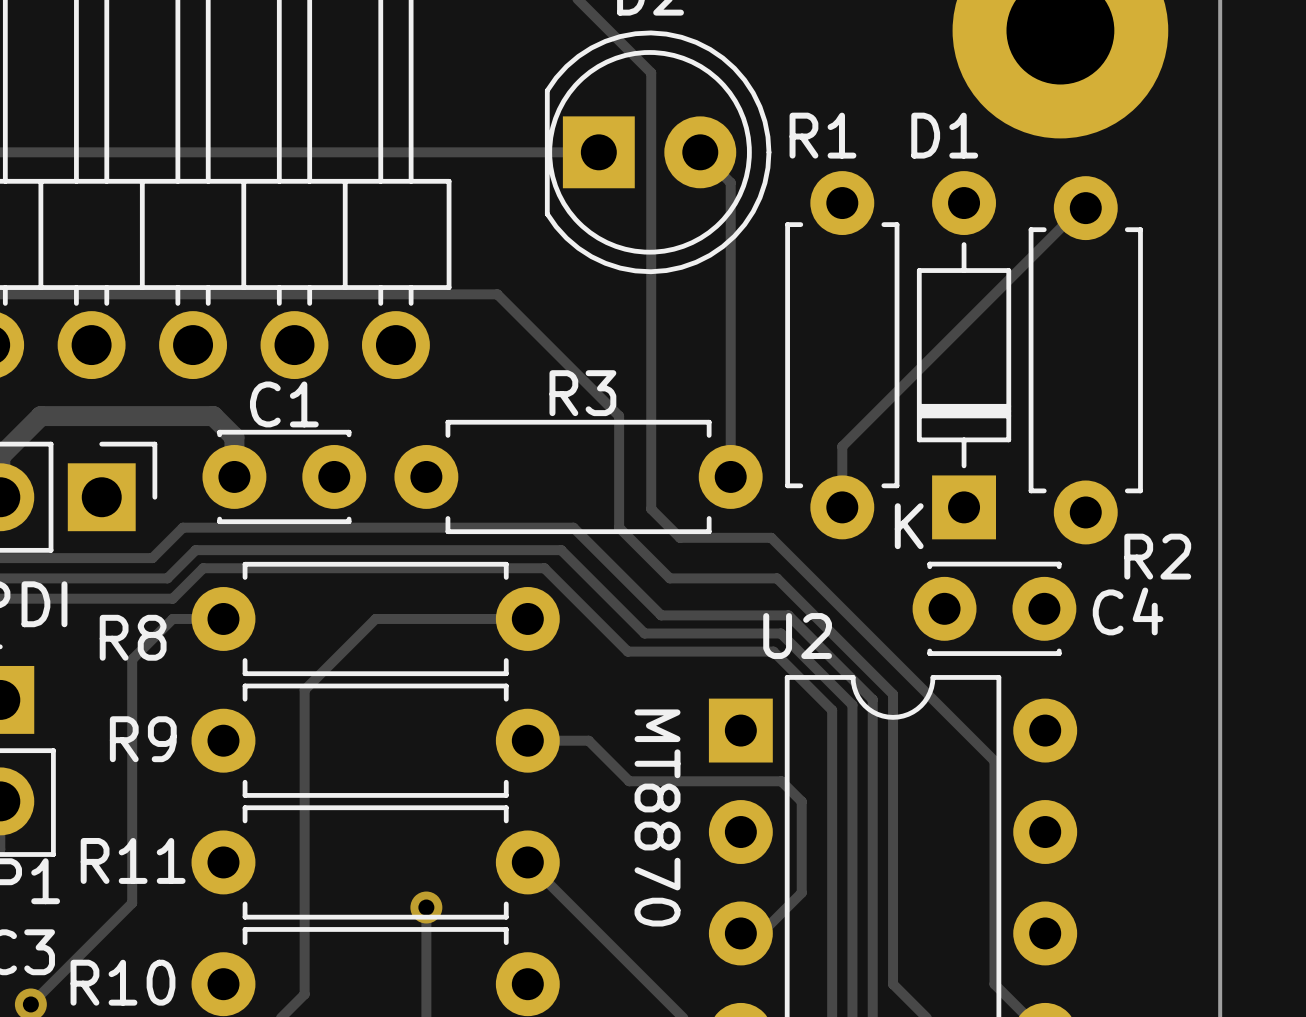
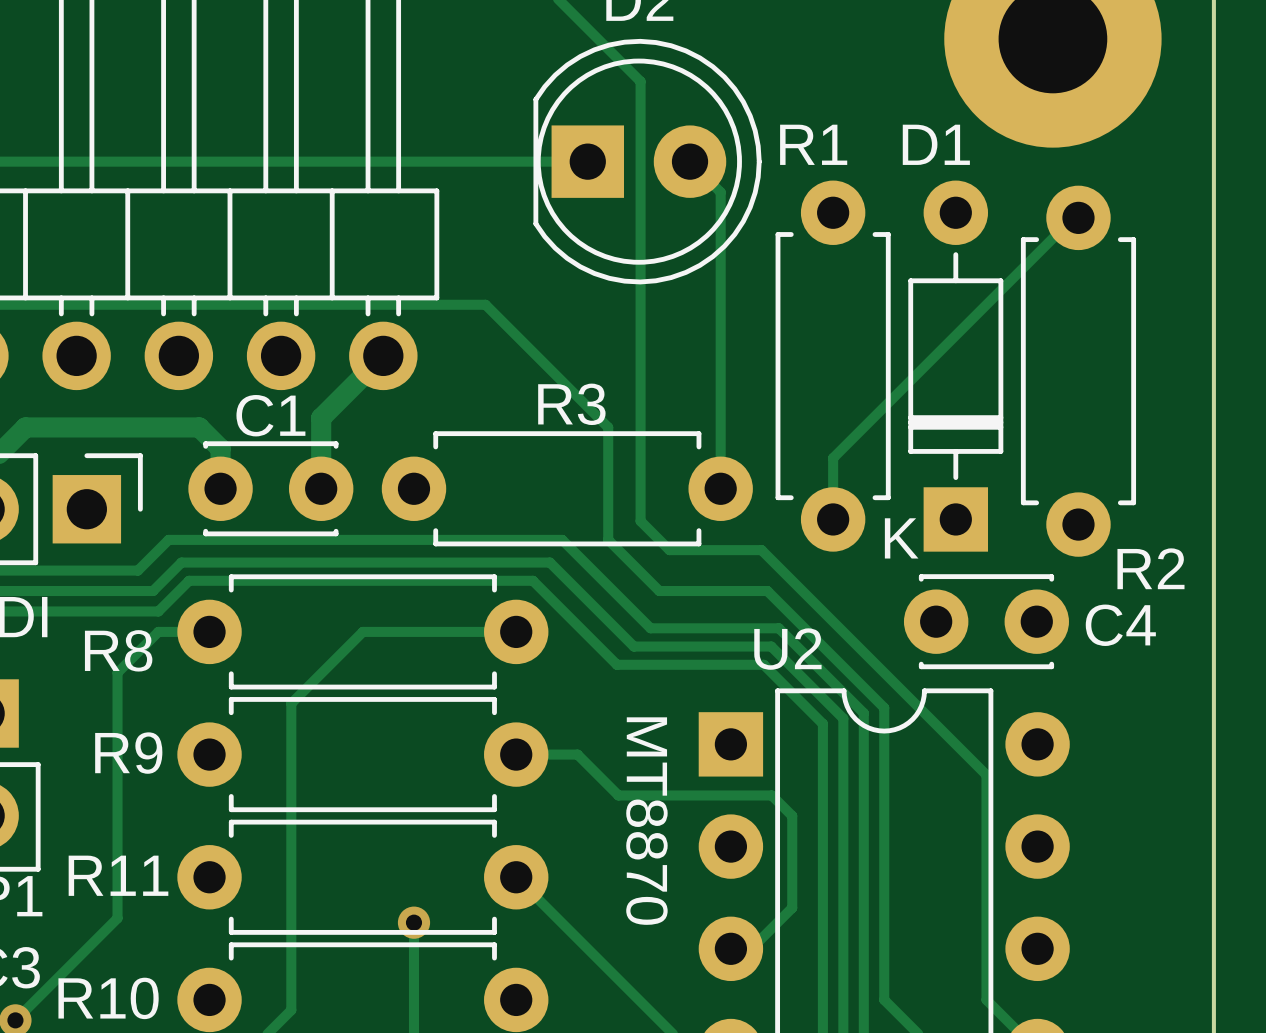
track: none -> (383, 355) (321, 418) (321, 488)

